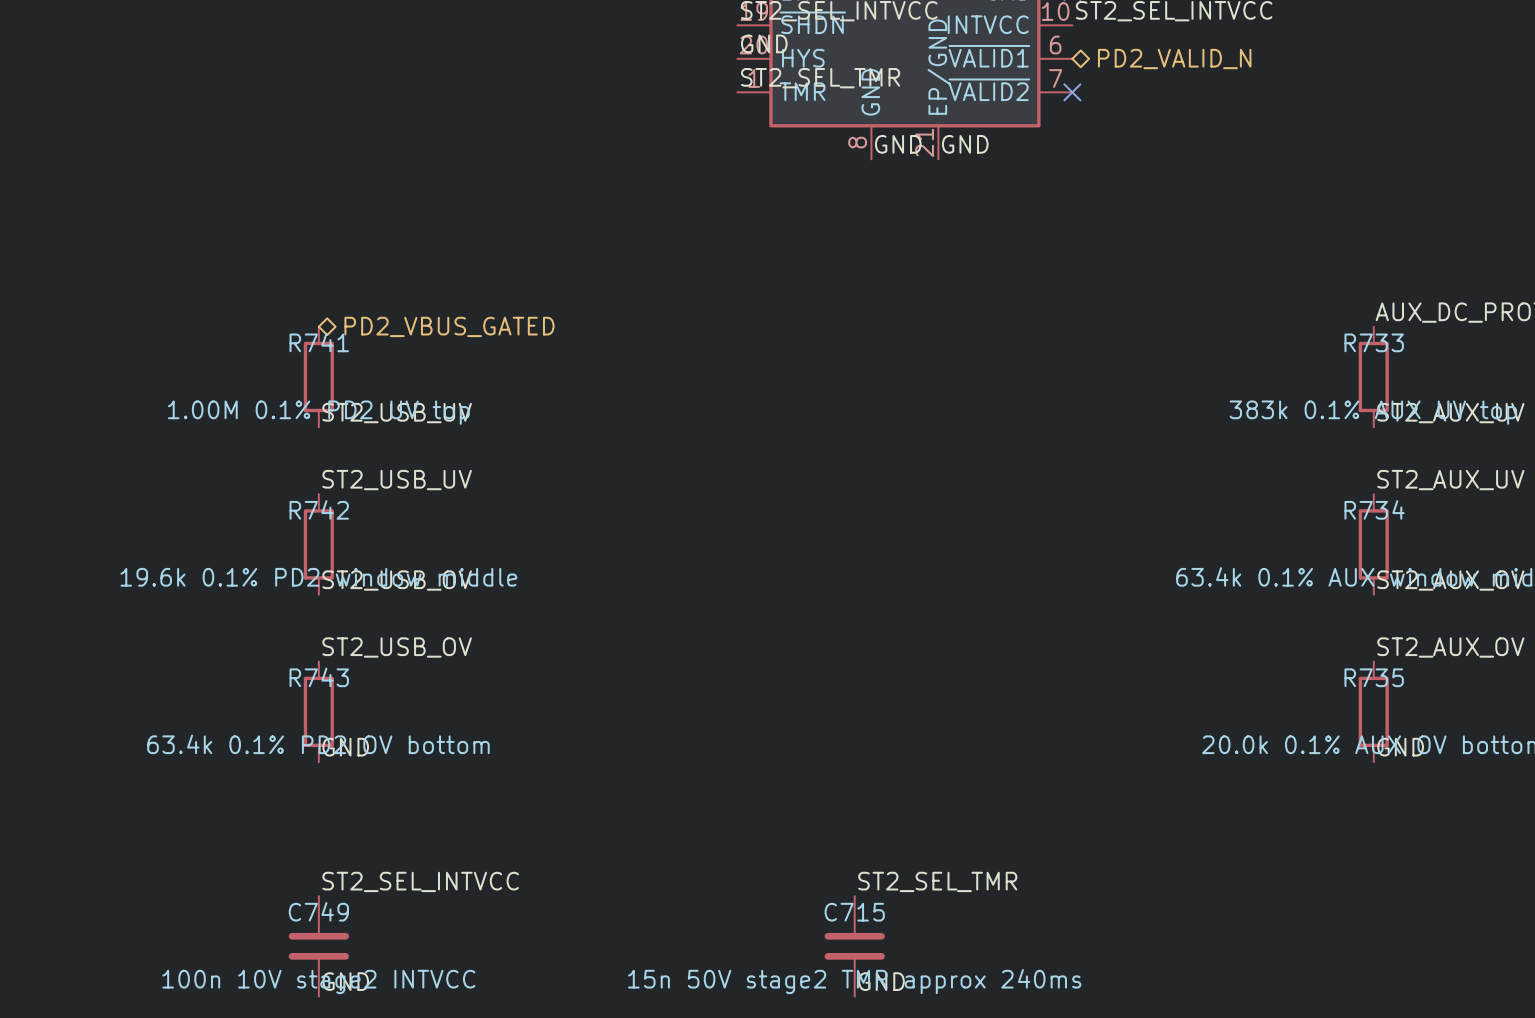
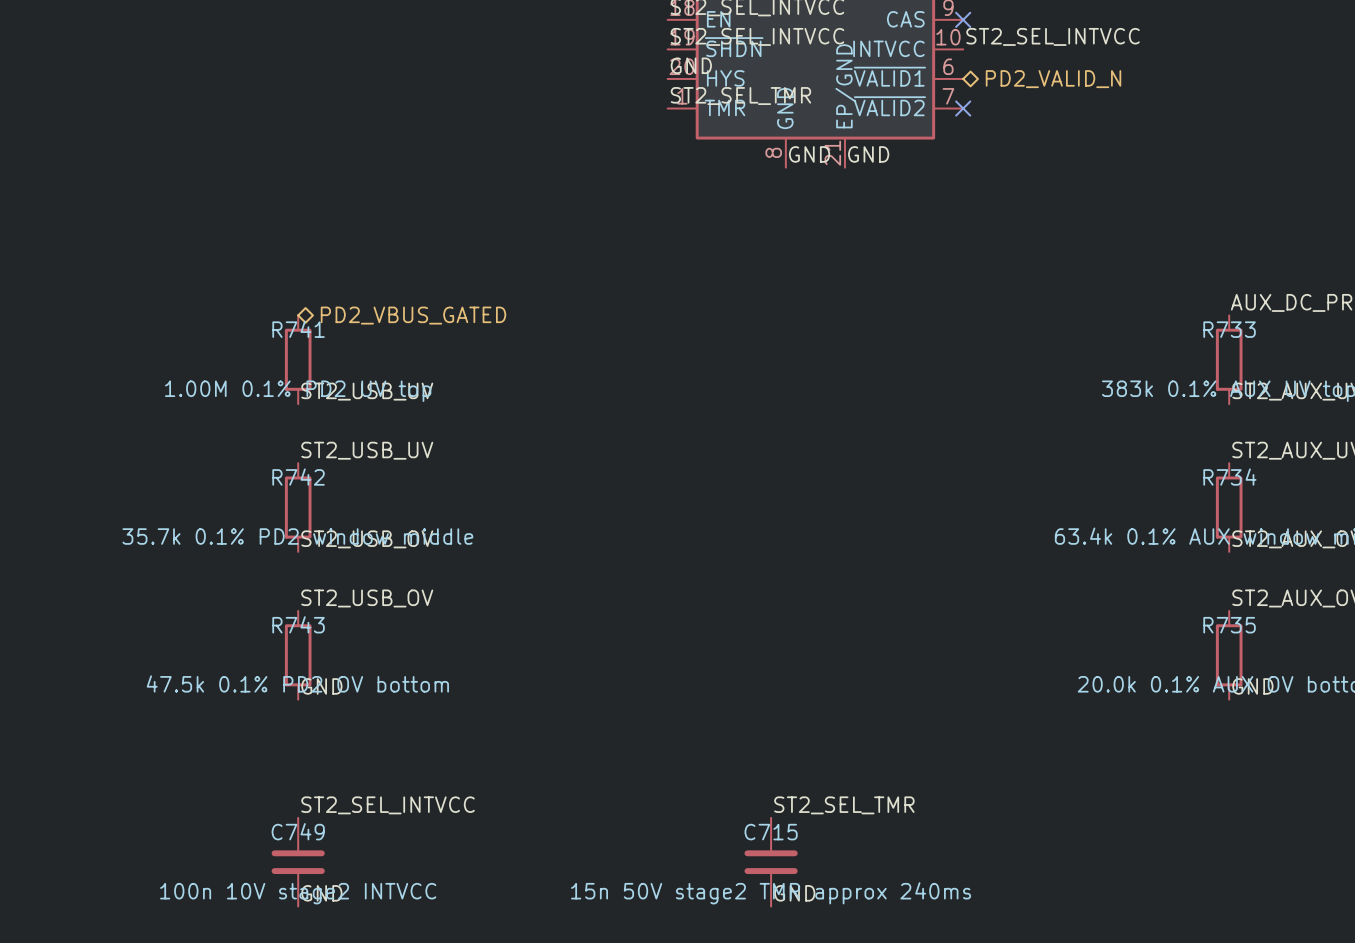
R742 value: 19.6k 0.1% PD2 window middle (318, 577) -> 35.7k 0.1% PD2 window middle (297, 536)
R743 value: 63.4k 0.1% PD2 OV bottom (318, 744) -> 47.5k 0.1% PD2 OV bottom (297, 683)

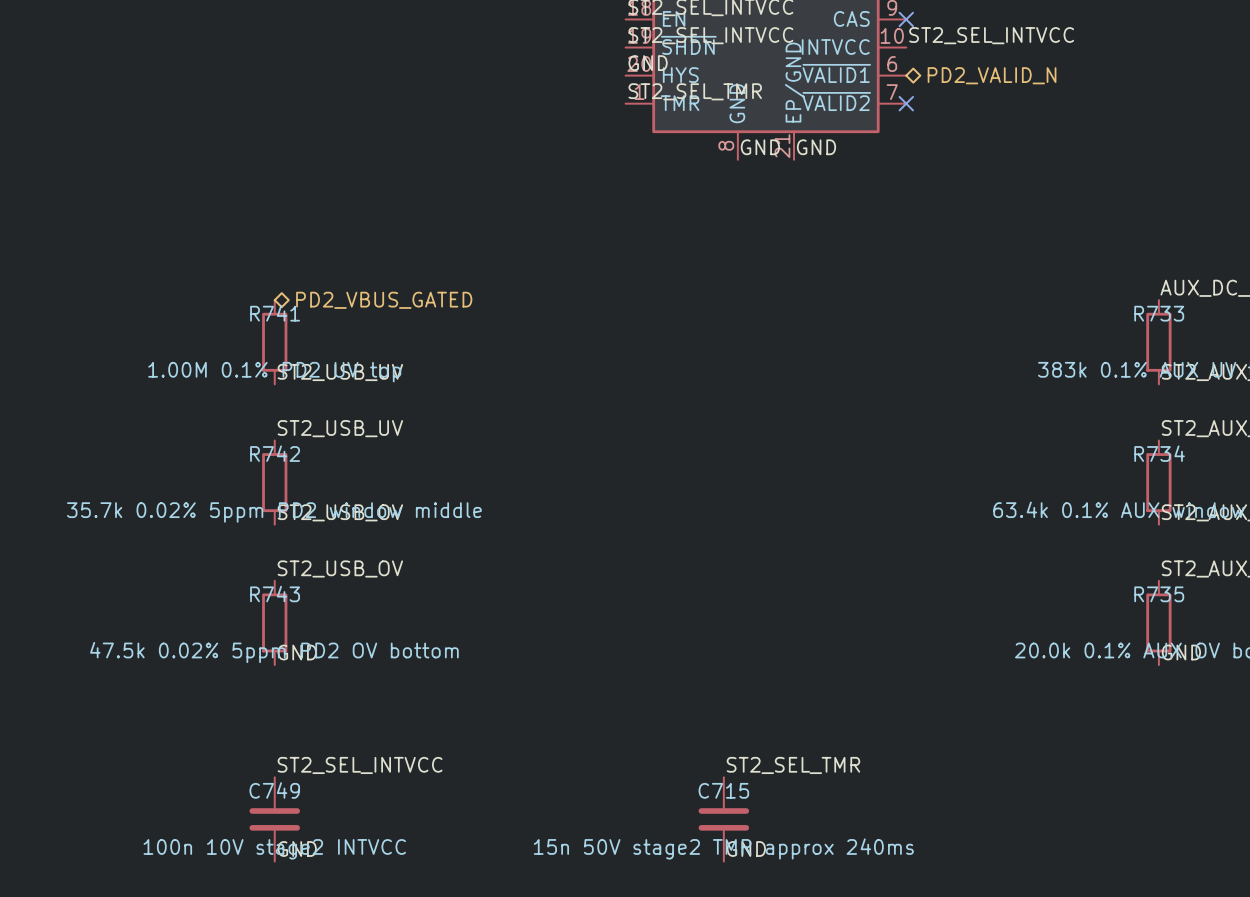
R742 value: 35.7k 0.1% PD2 window middle (297, 536) -> 35.7k 0.02% 5ppm PD2 window middle (274, 512)
R743 value: 47.5k 0.1% PD2 OV bottom (297, 683) -> 47.5k 0.02% 5ppm PD2 OV bottom (274, 652)

